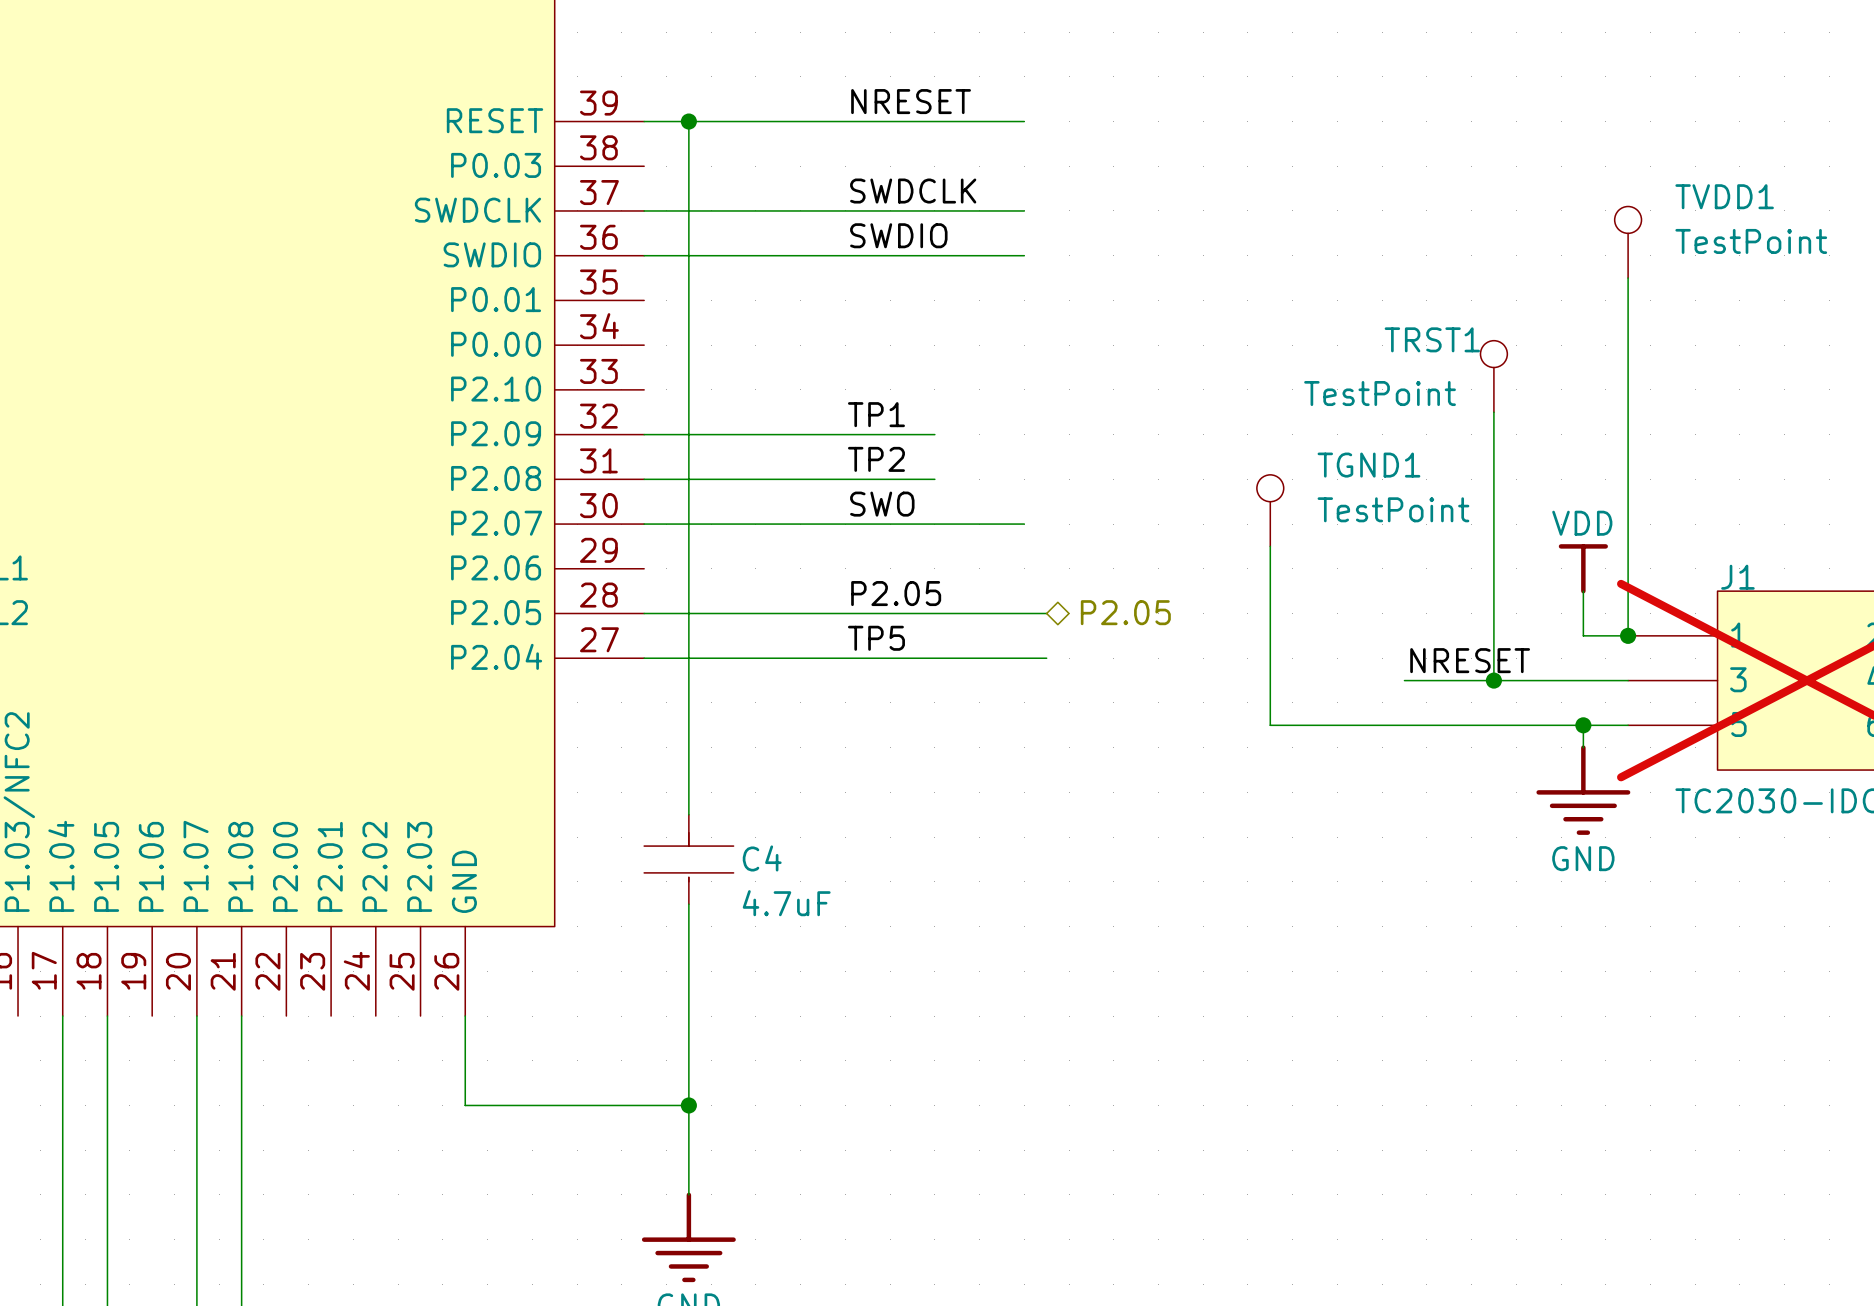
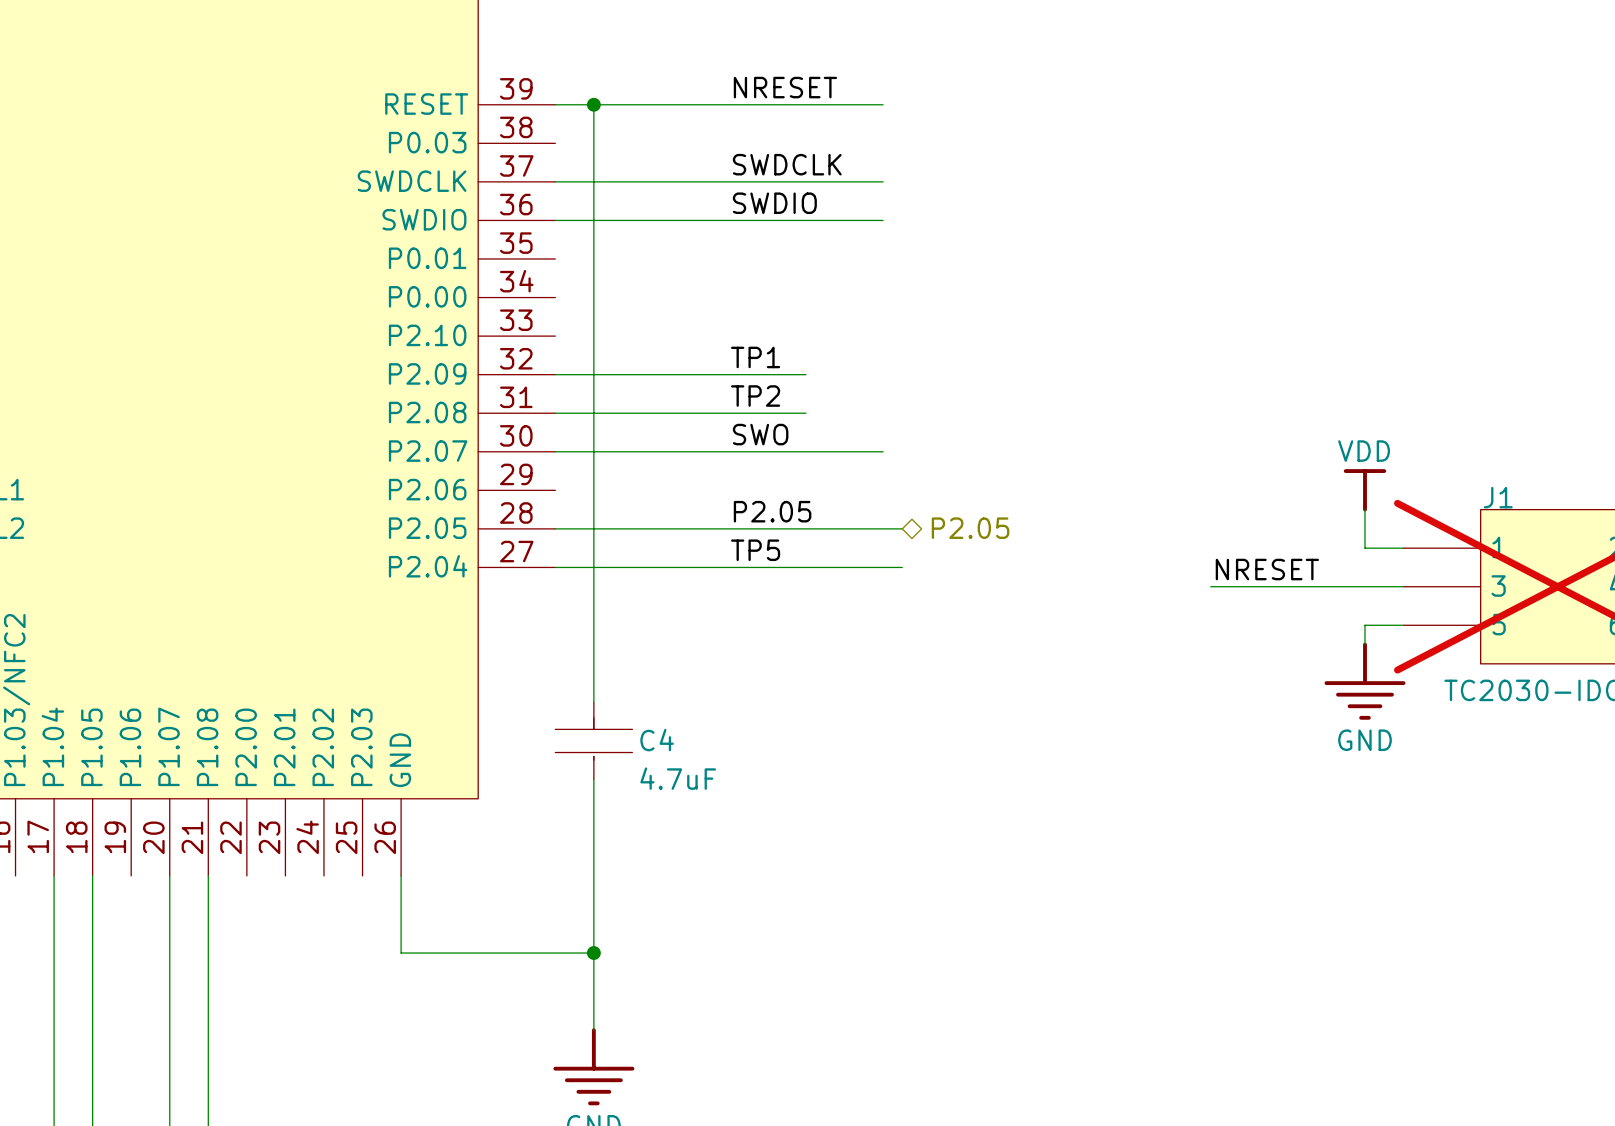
TVDD1: TestPoint (1628, 242) -> none
wire: (1628, 278) (1628, 635) -> none
TRST1: TestPoint (1493, 376) -> none
wire: (1493, 412) (1493, 680) -> none
TGND1: TestPoint (1270, 510) -> none
wire: (1270, 546) (1270, 725) (1583, 725) -> none
junction: (1628, 635) -> none
junction: (1493, 680) -> none
junction: (1583, 725) -> none

